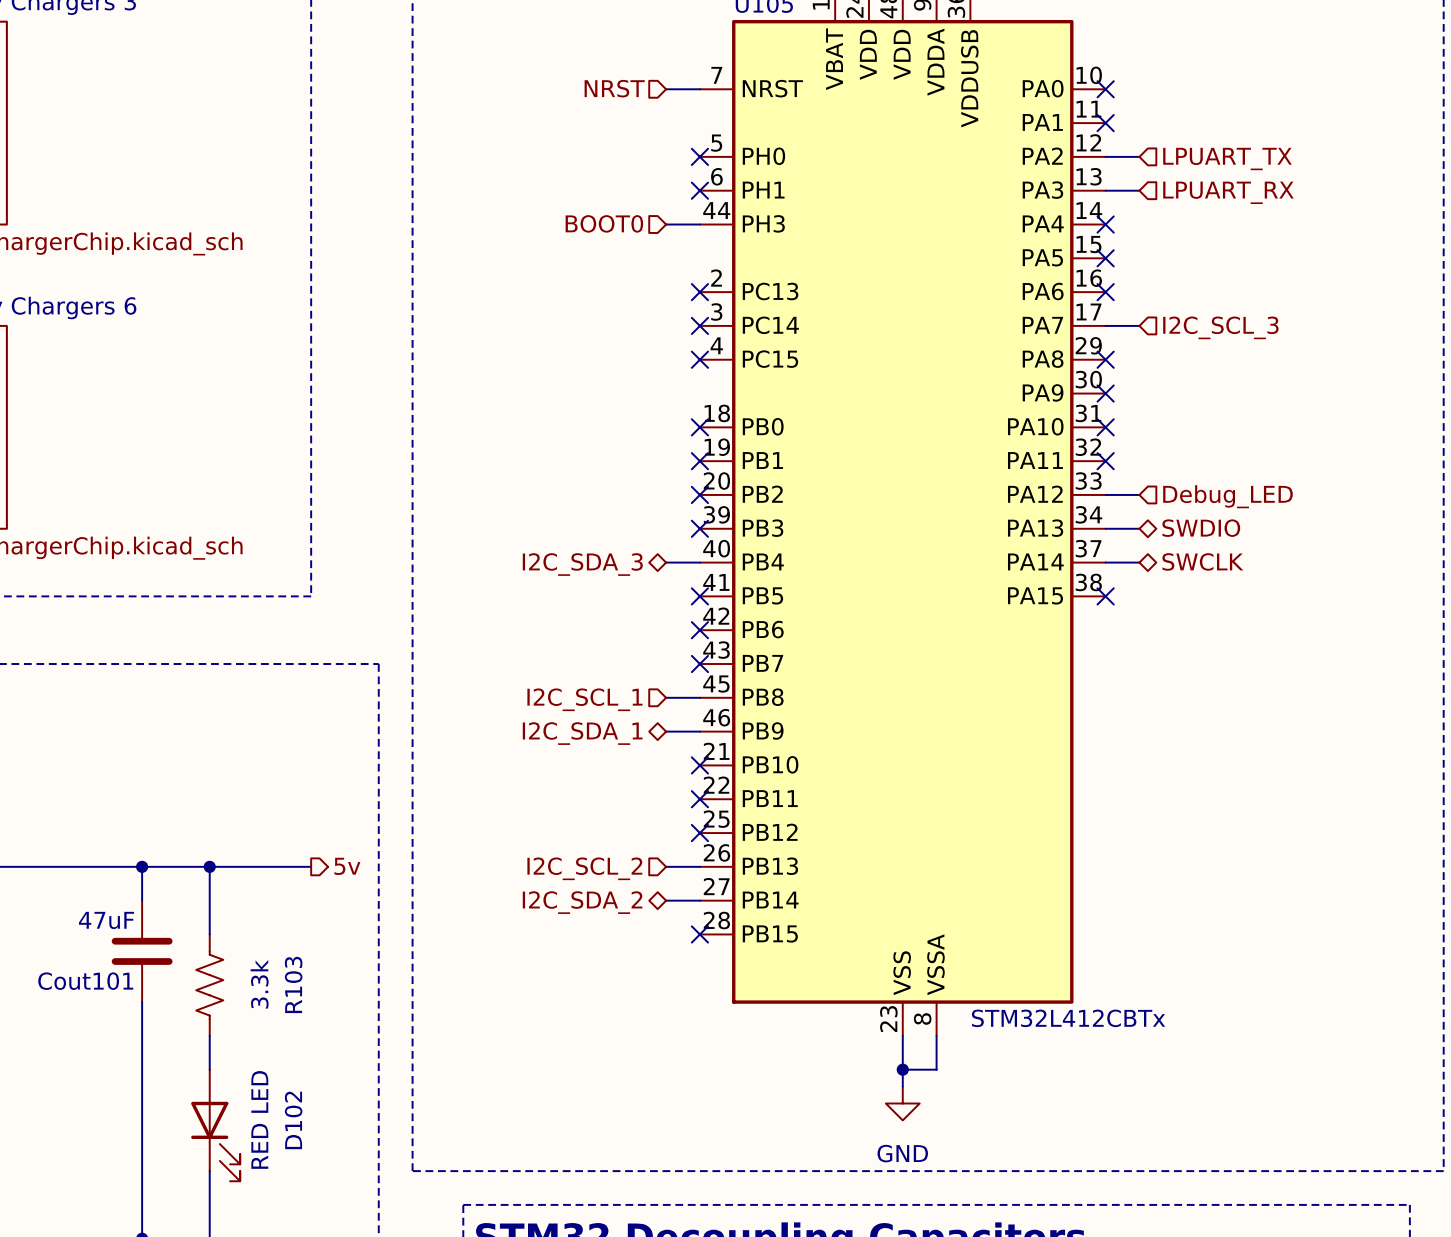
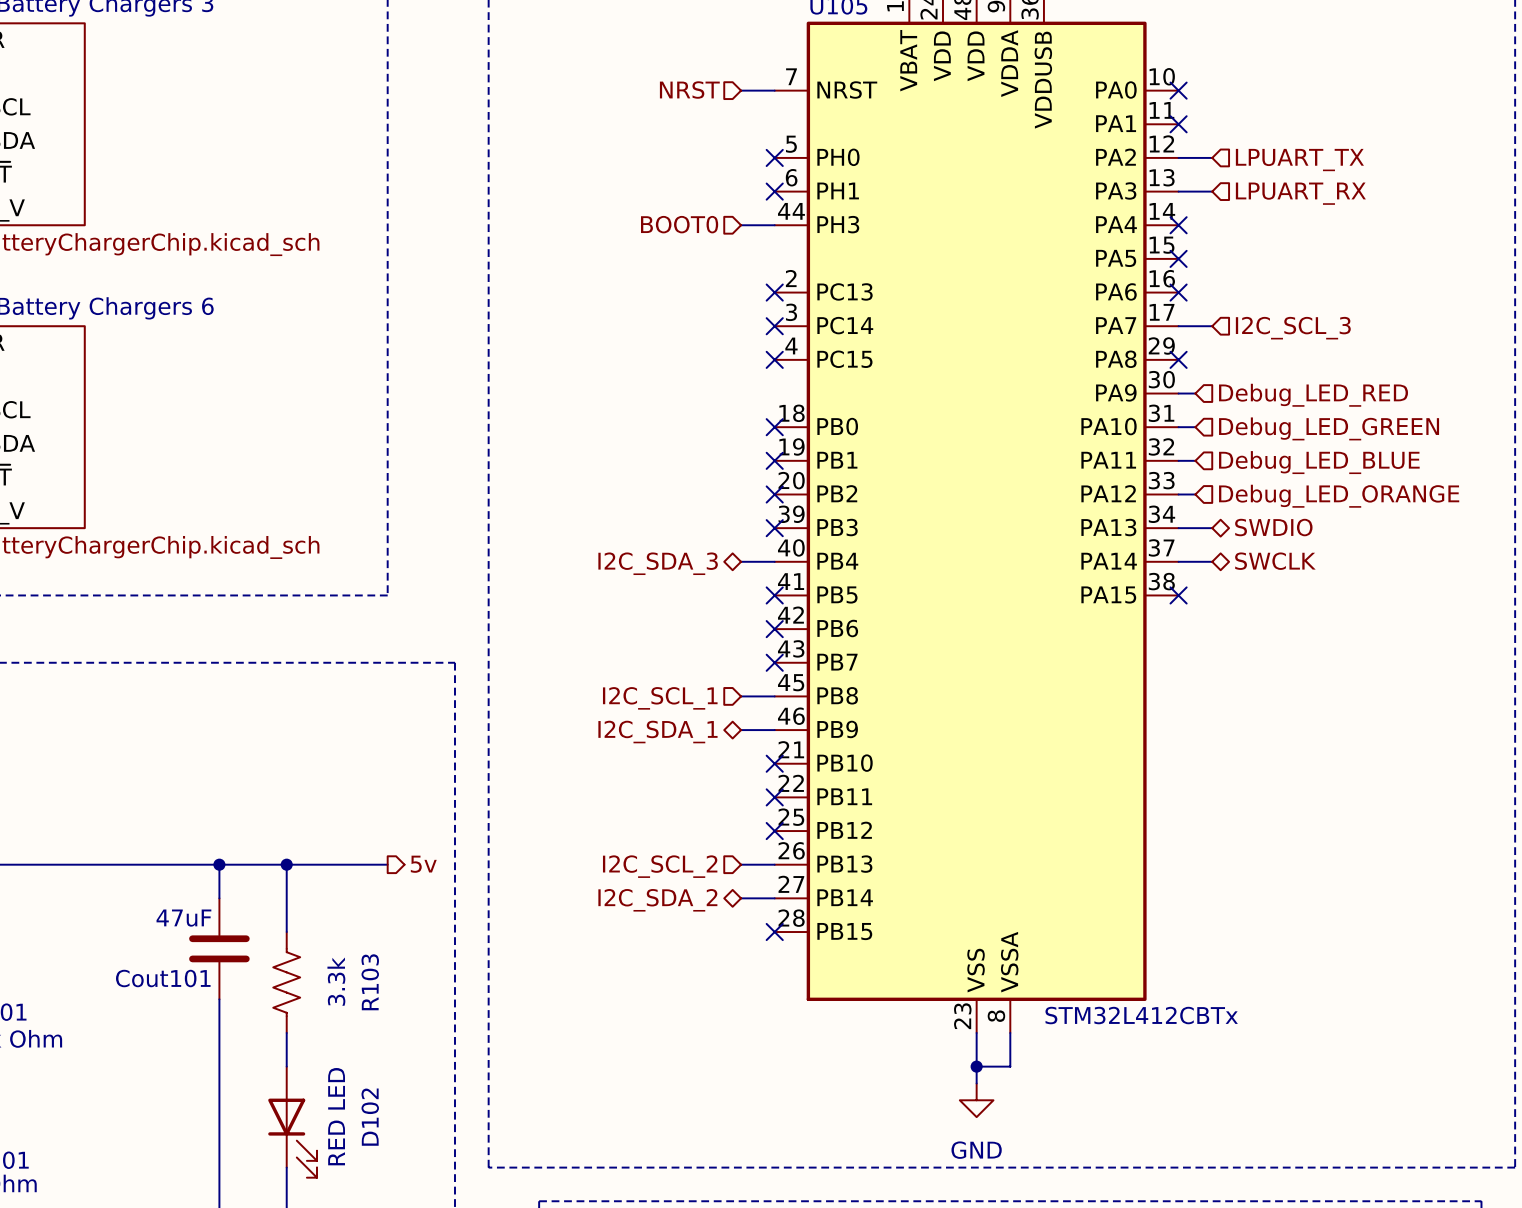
wire: none -> (1178, 393) (1195, 393)
no-connect mark: (1105, 393) -> none
hierarchical label: none -> Debug_LED_RED (1313, 395)
wire: none -> (1178, 427) (1195, 427)
no-connect mark: (1105, 427) -> none
hierarchical label: none -> Debug_LED_GREEN (1329, 428)
no-connect mark: (1105, 461) -> none
hierarchical label: none -> Debug_LED_BLUE (1319, 462)
wire: (1122, 494) (1139, 494) -> (1178, 460) (1195, 460)
hierarchical label: Debug_LED (1227, 496) -> Debug_LED_ORANGE (1339, 496)

